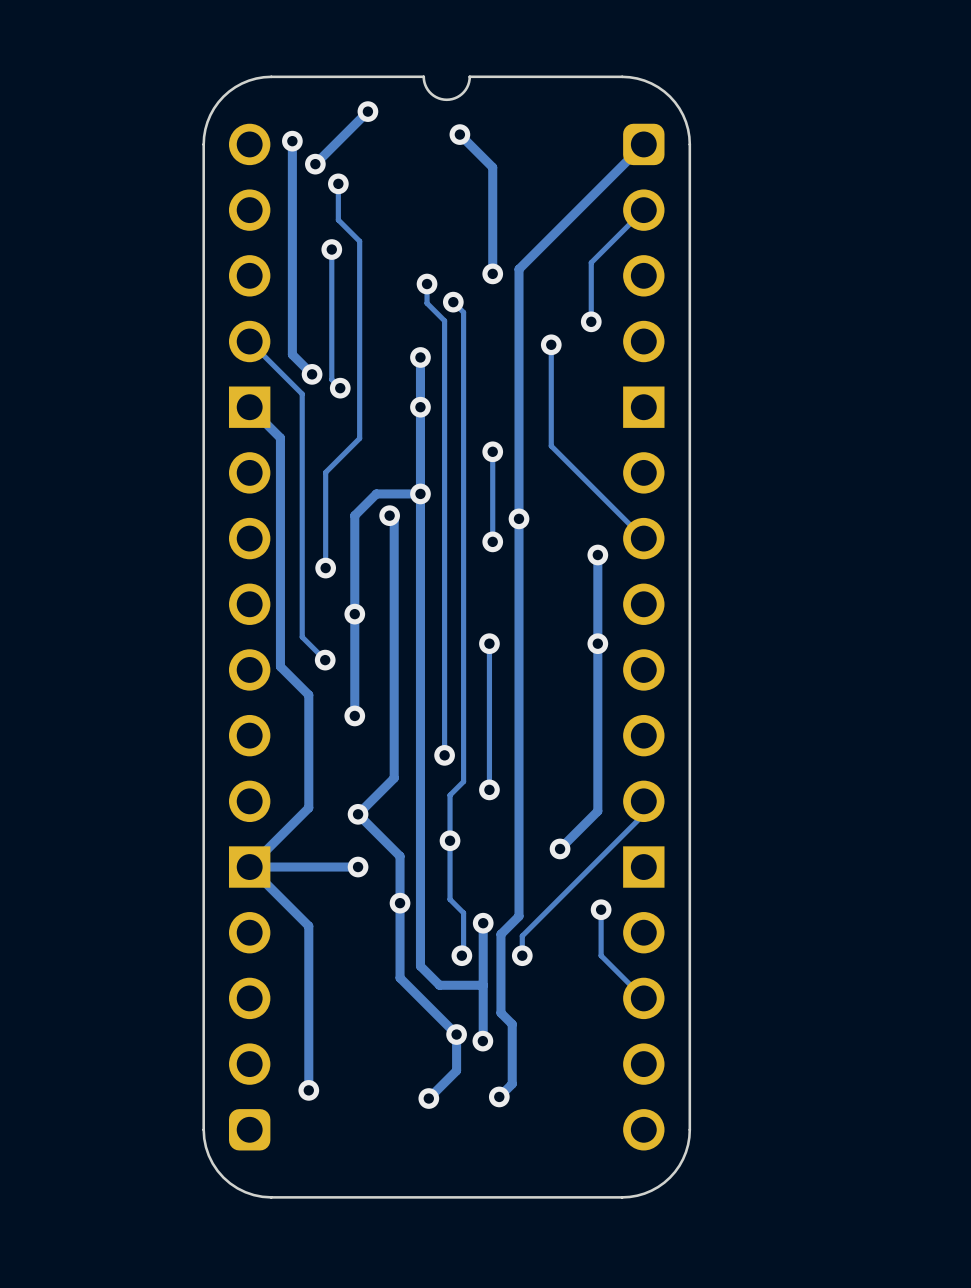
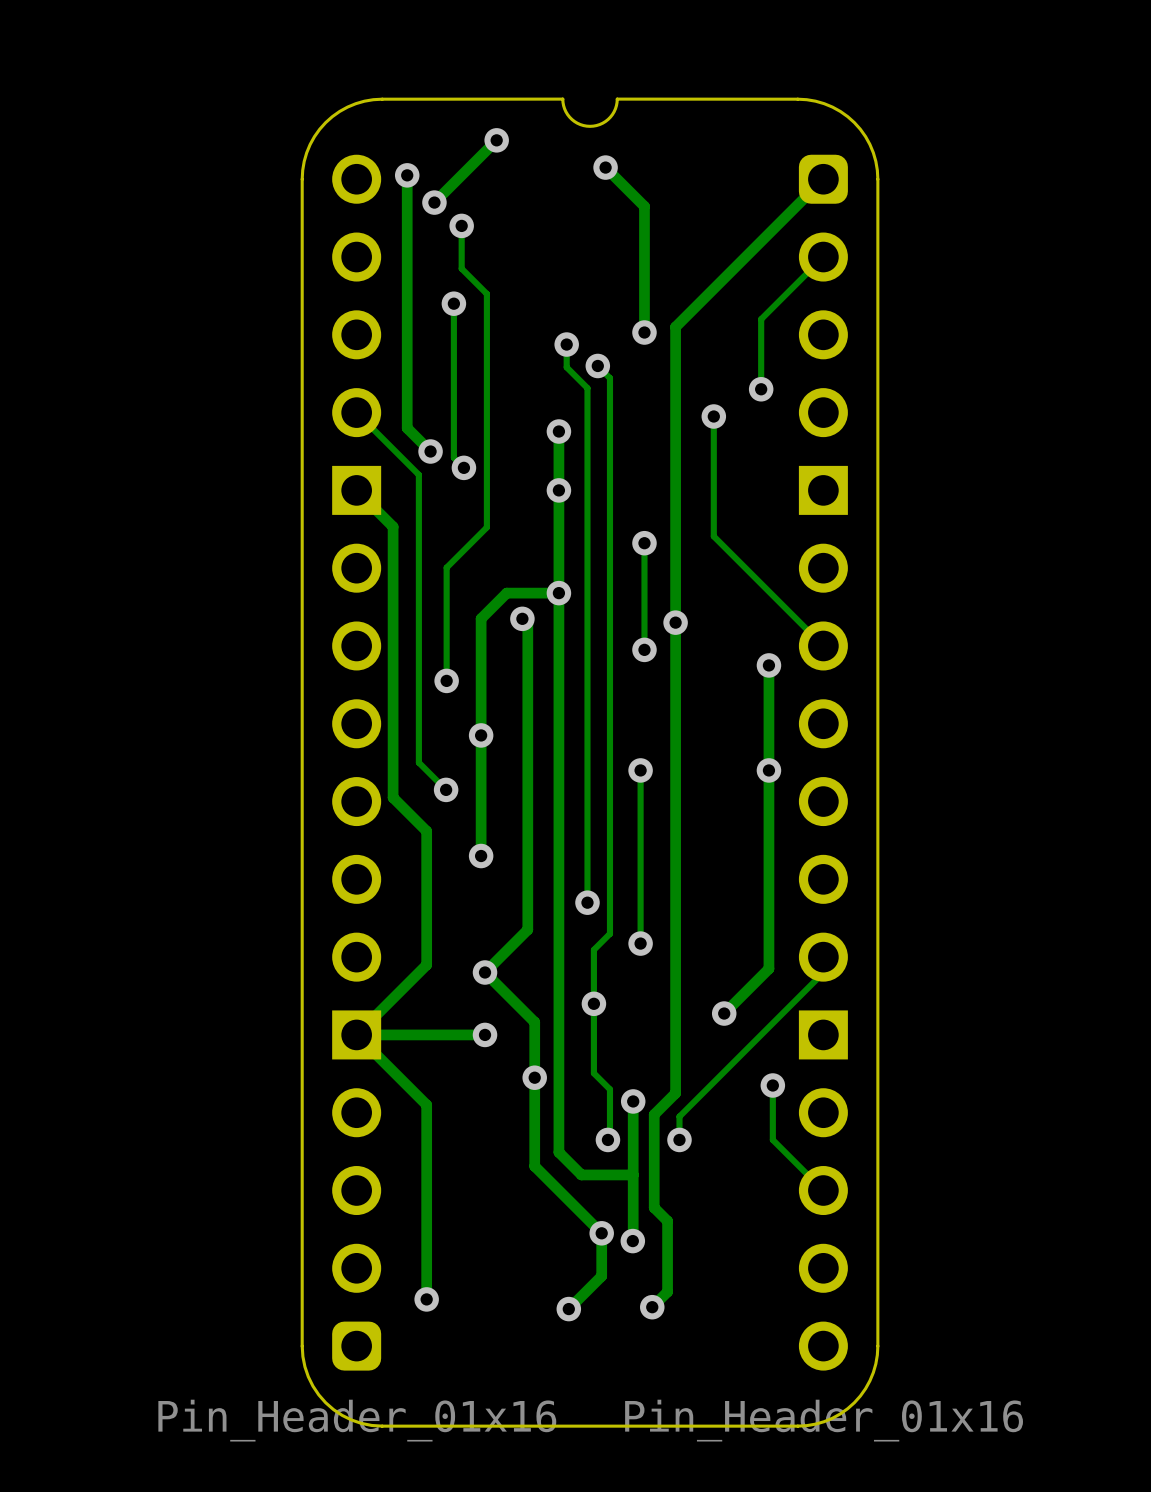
drawing: none -> [158, 1399, 1024, 1442]

